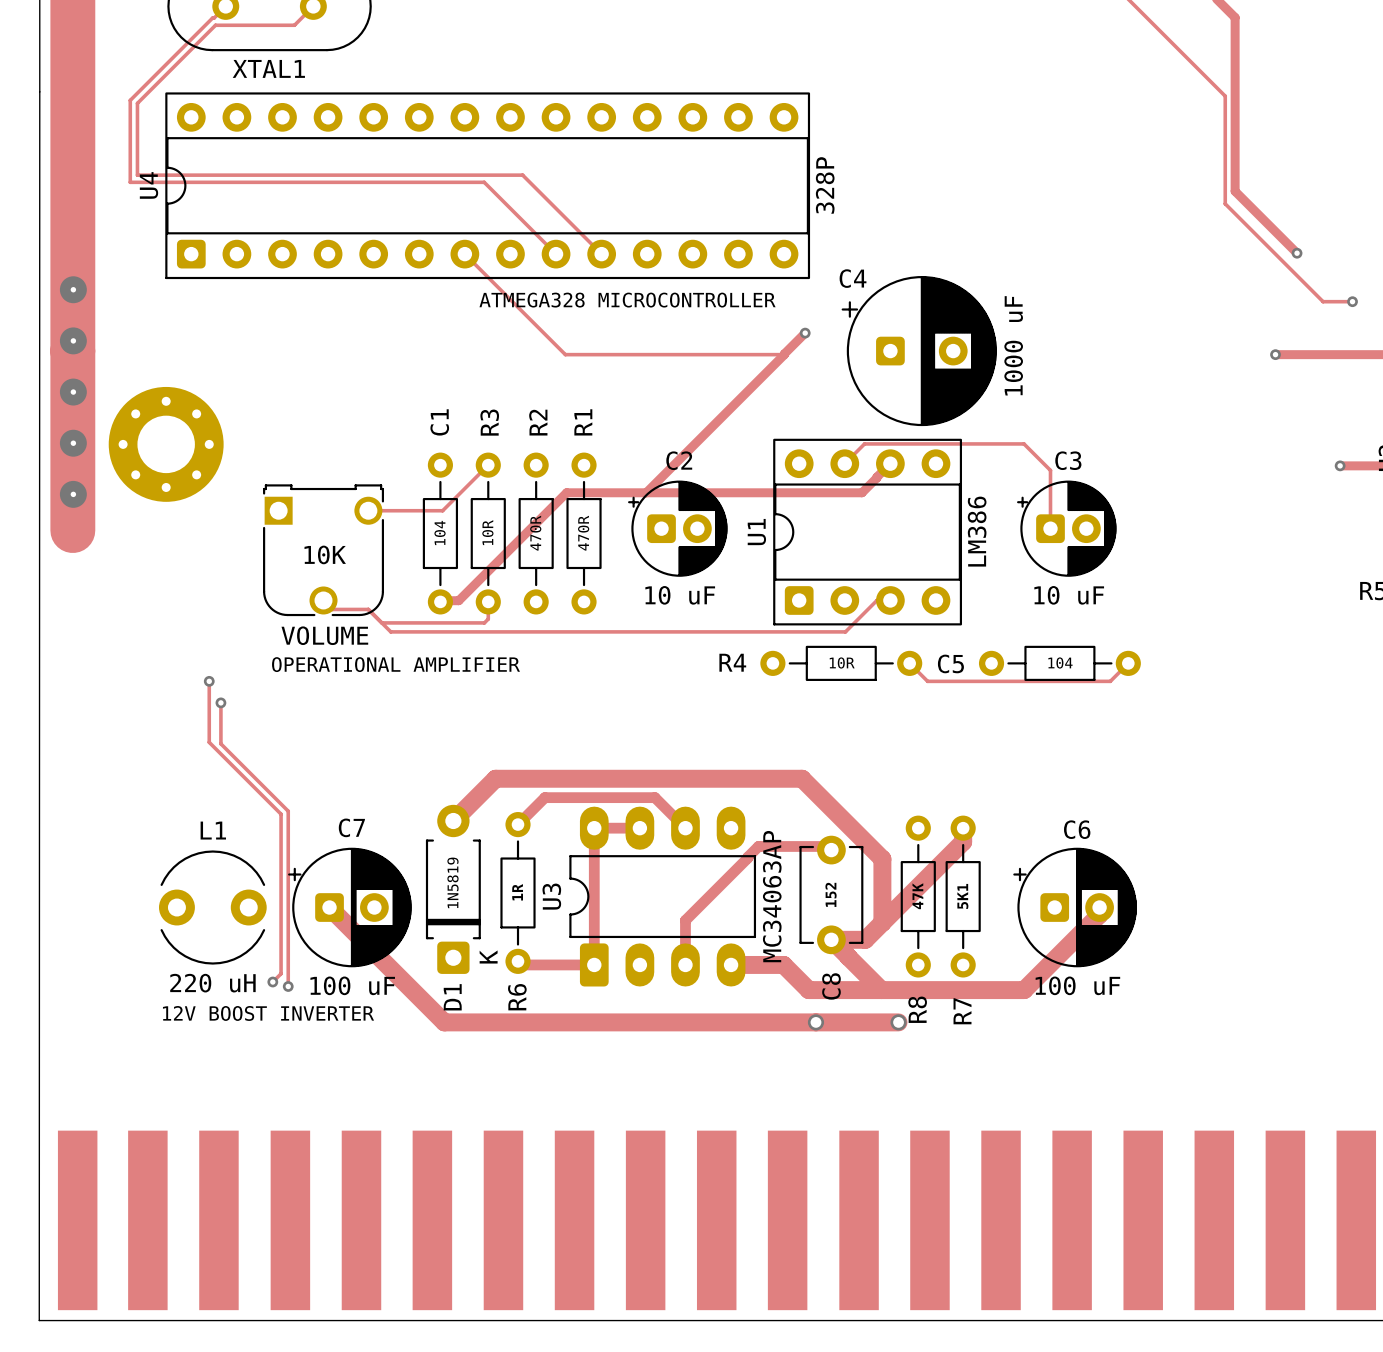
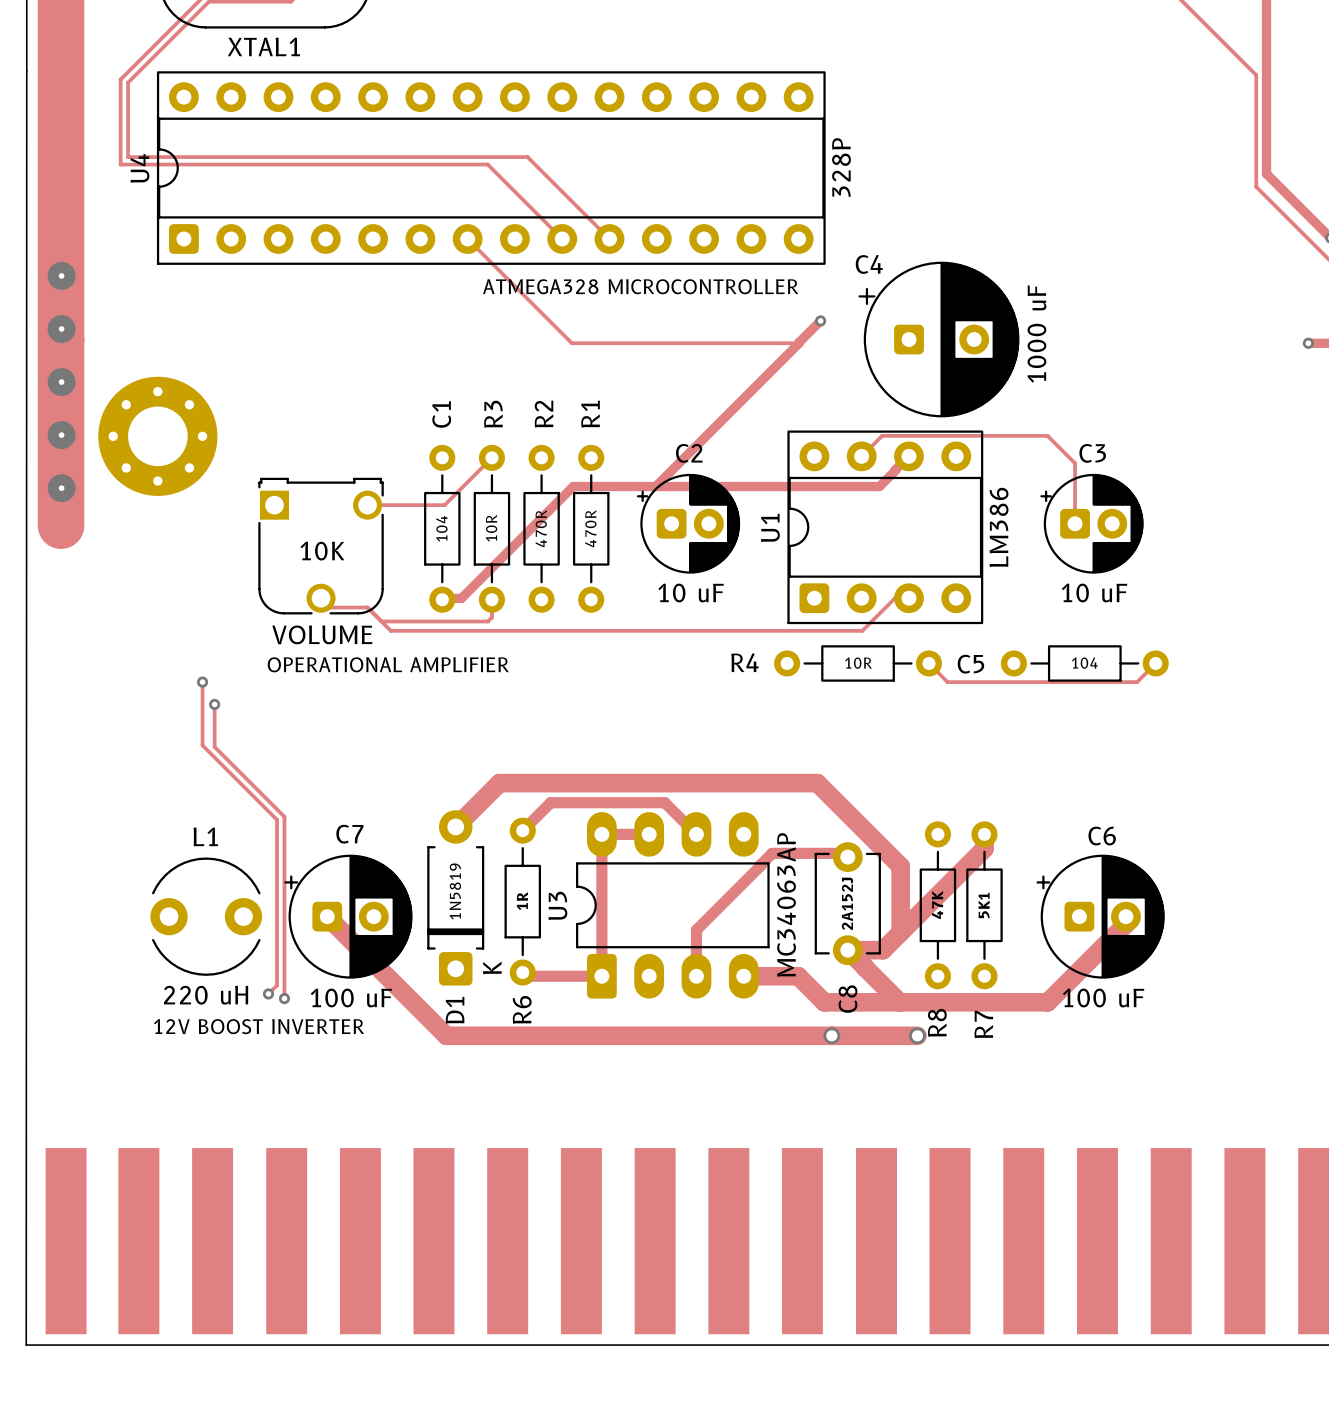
C8 value: 152 (831, 894) -> 2A152J (847, 903)

